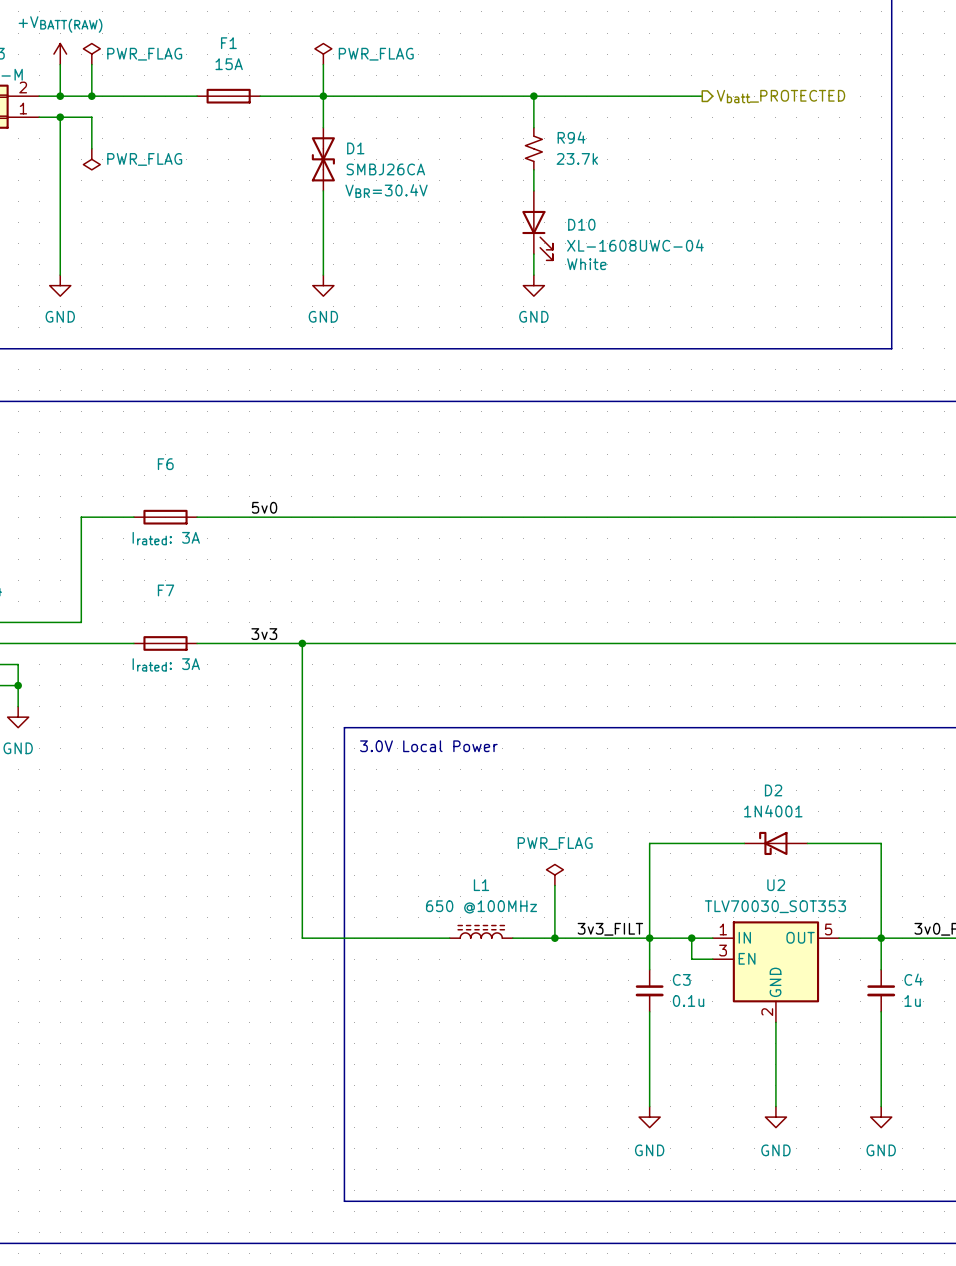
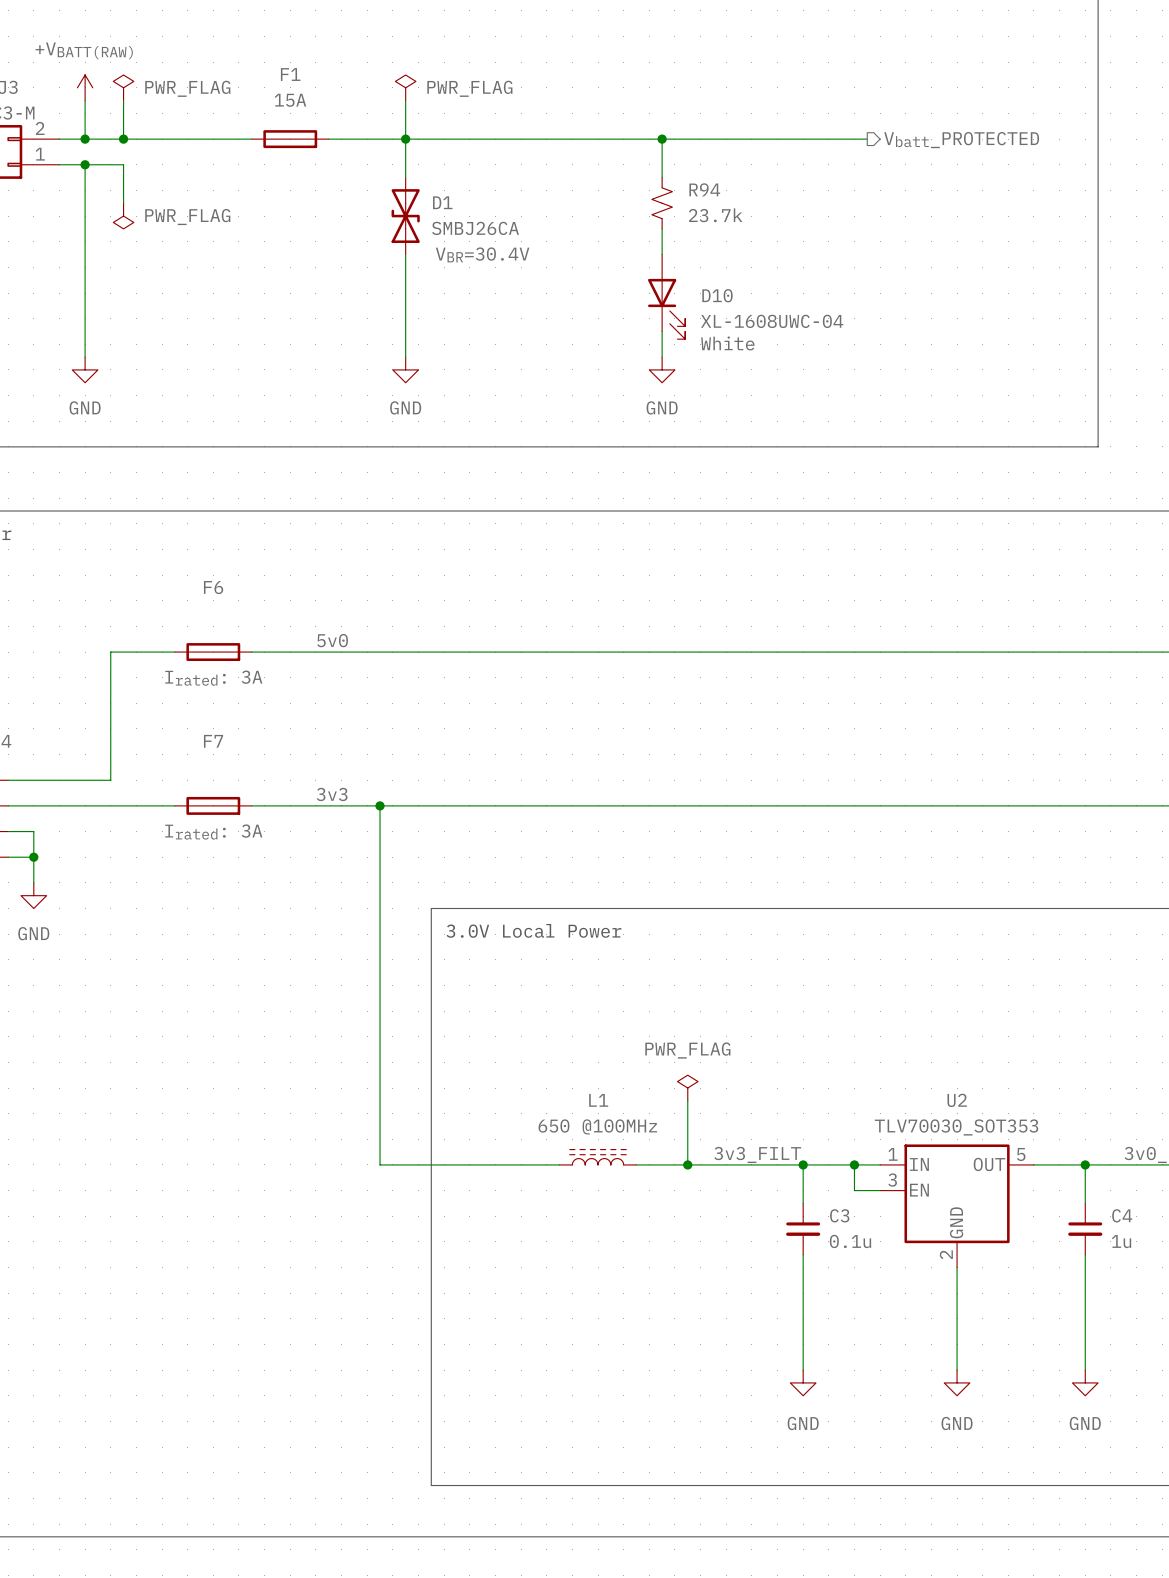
wire: (744, 843) (649, 843) (649, 938) -> none
D2: 1N4001 (775, 843) -> none
wire: (807, 843) (881, 843) (881, 938) -> none

